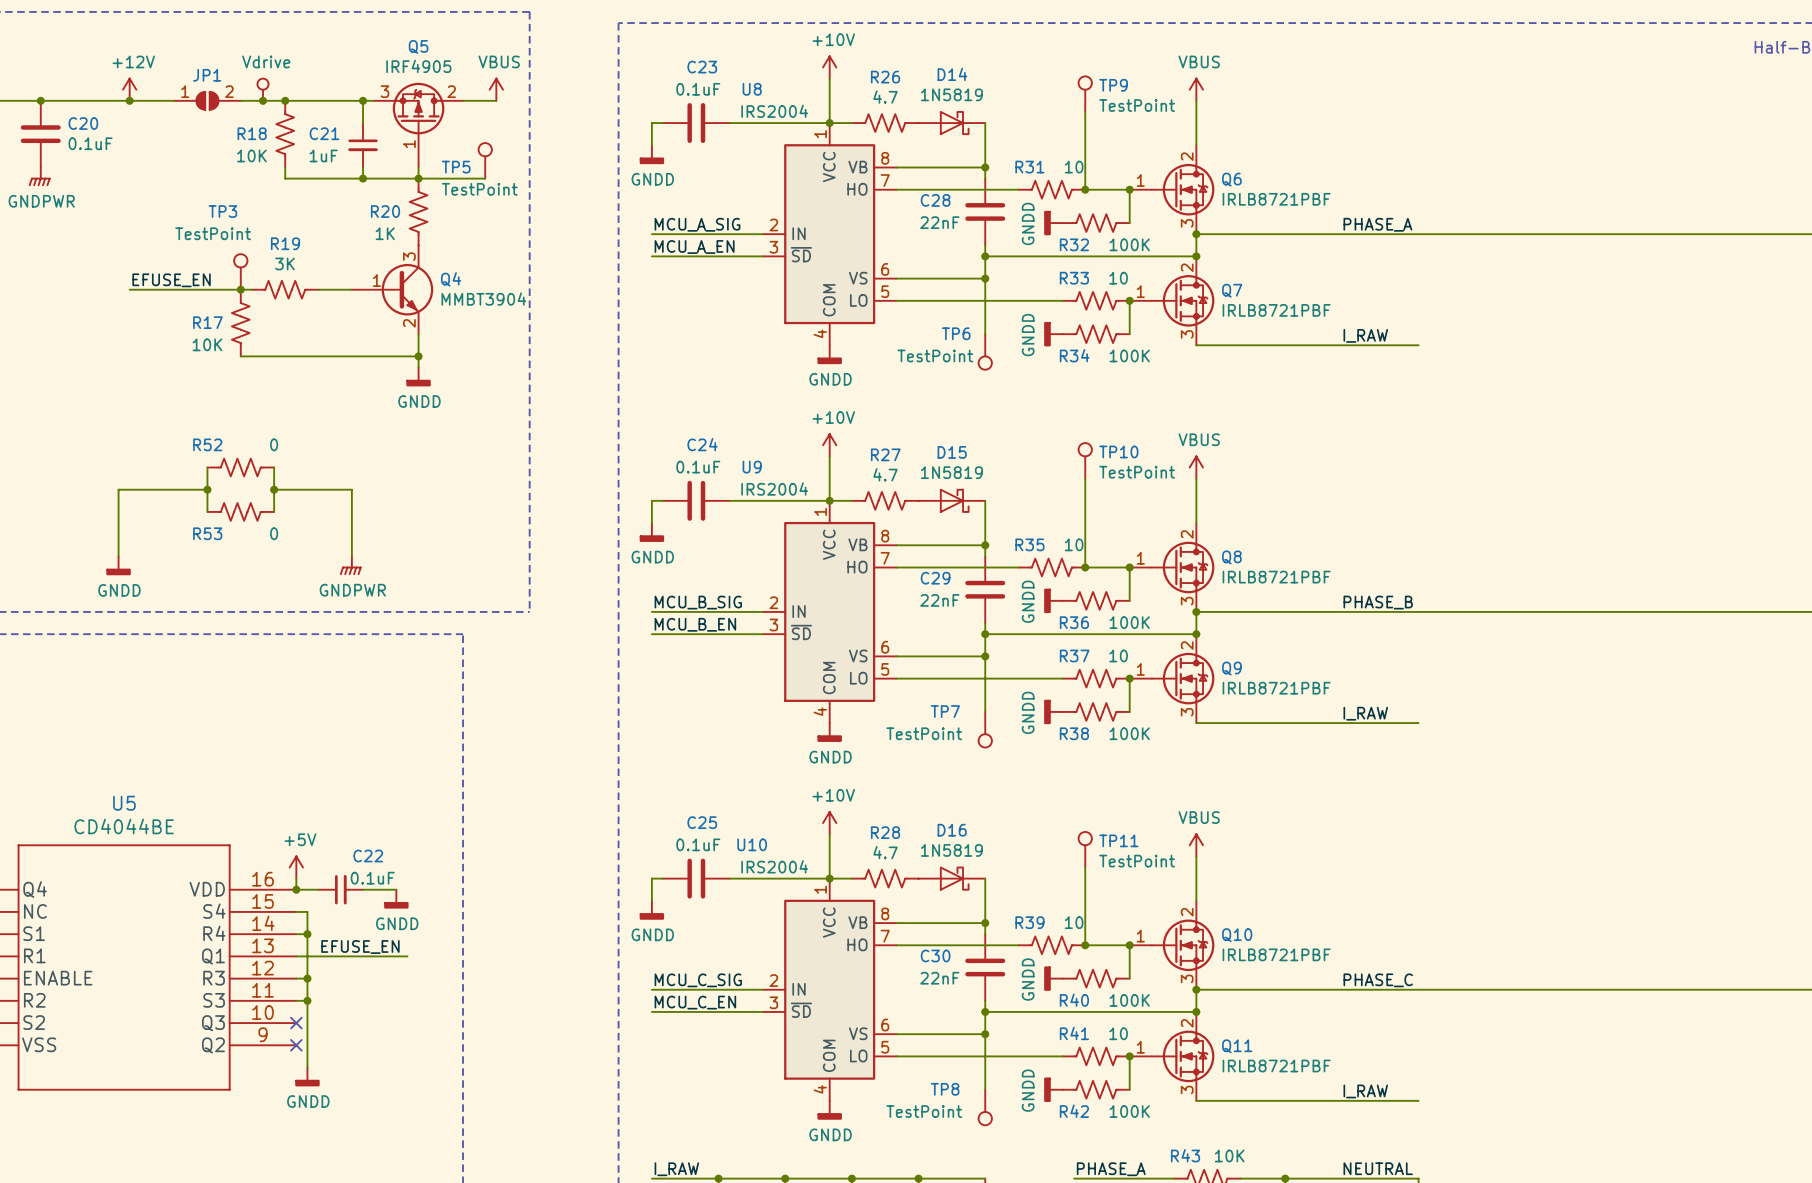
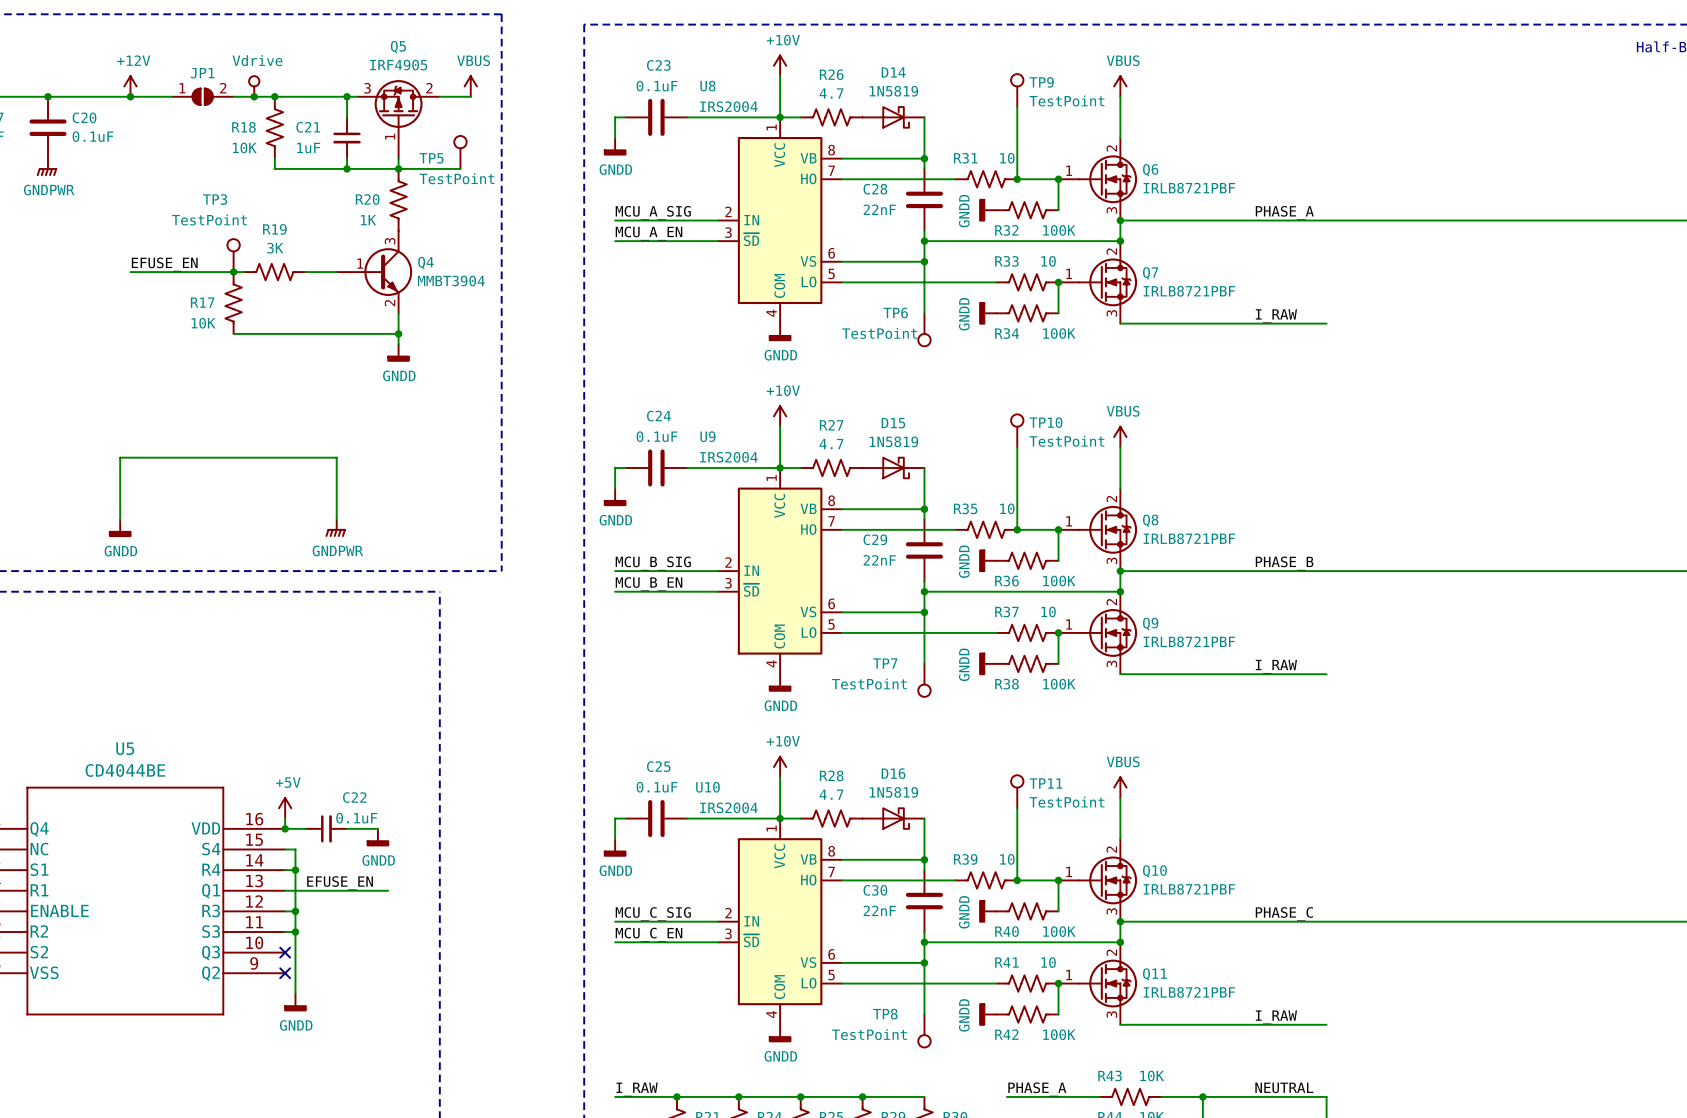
wire: (207, 467) (207, 511) -> none
R52: 0 (240, 467) -> none
wire: (274, 467) (274, 511) -> none
wire: none -> (202, 457) (264, 457)
junction: (207, 489) -> none
junction: (274, 489) -> none
R53: 0 (240, 511) -> none

